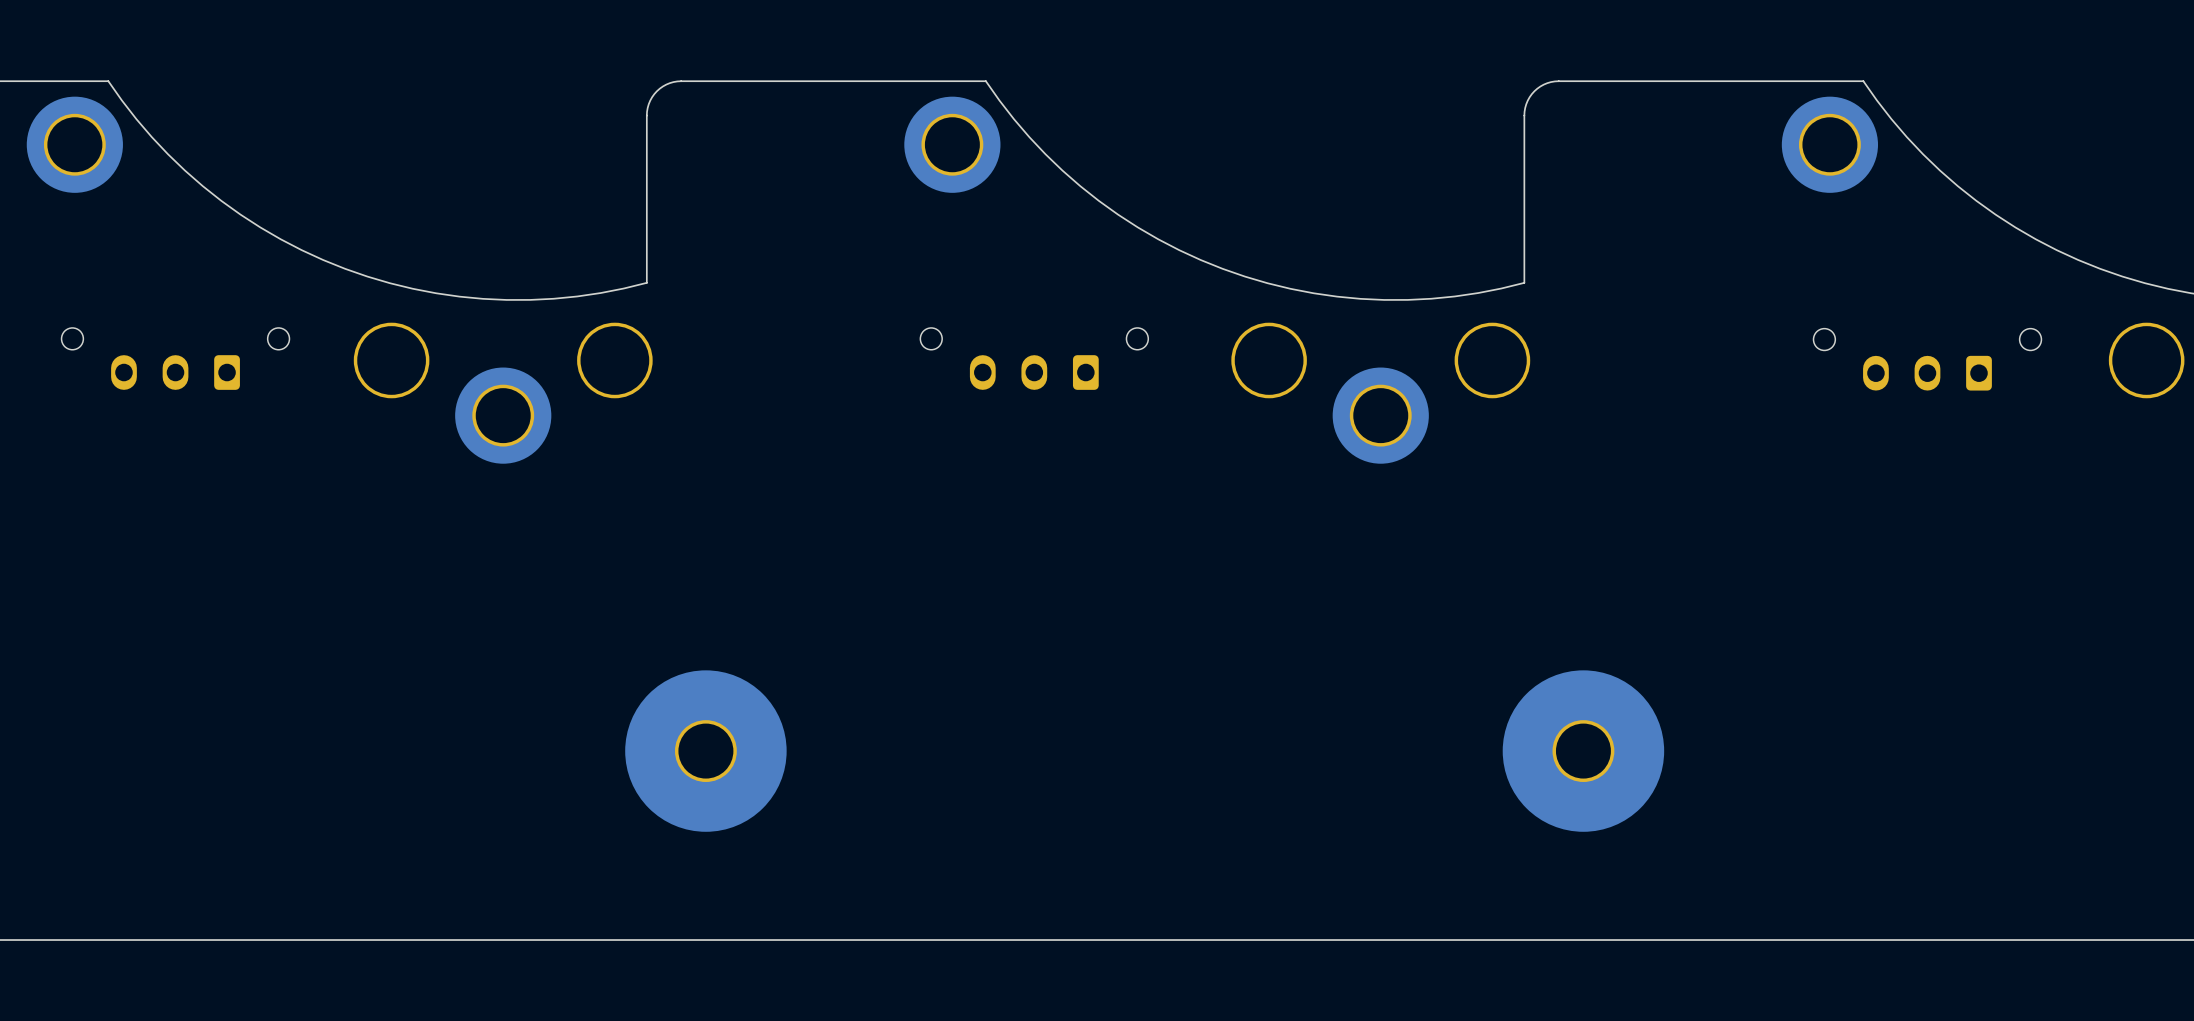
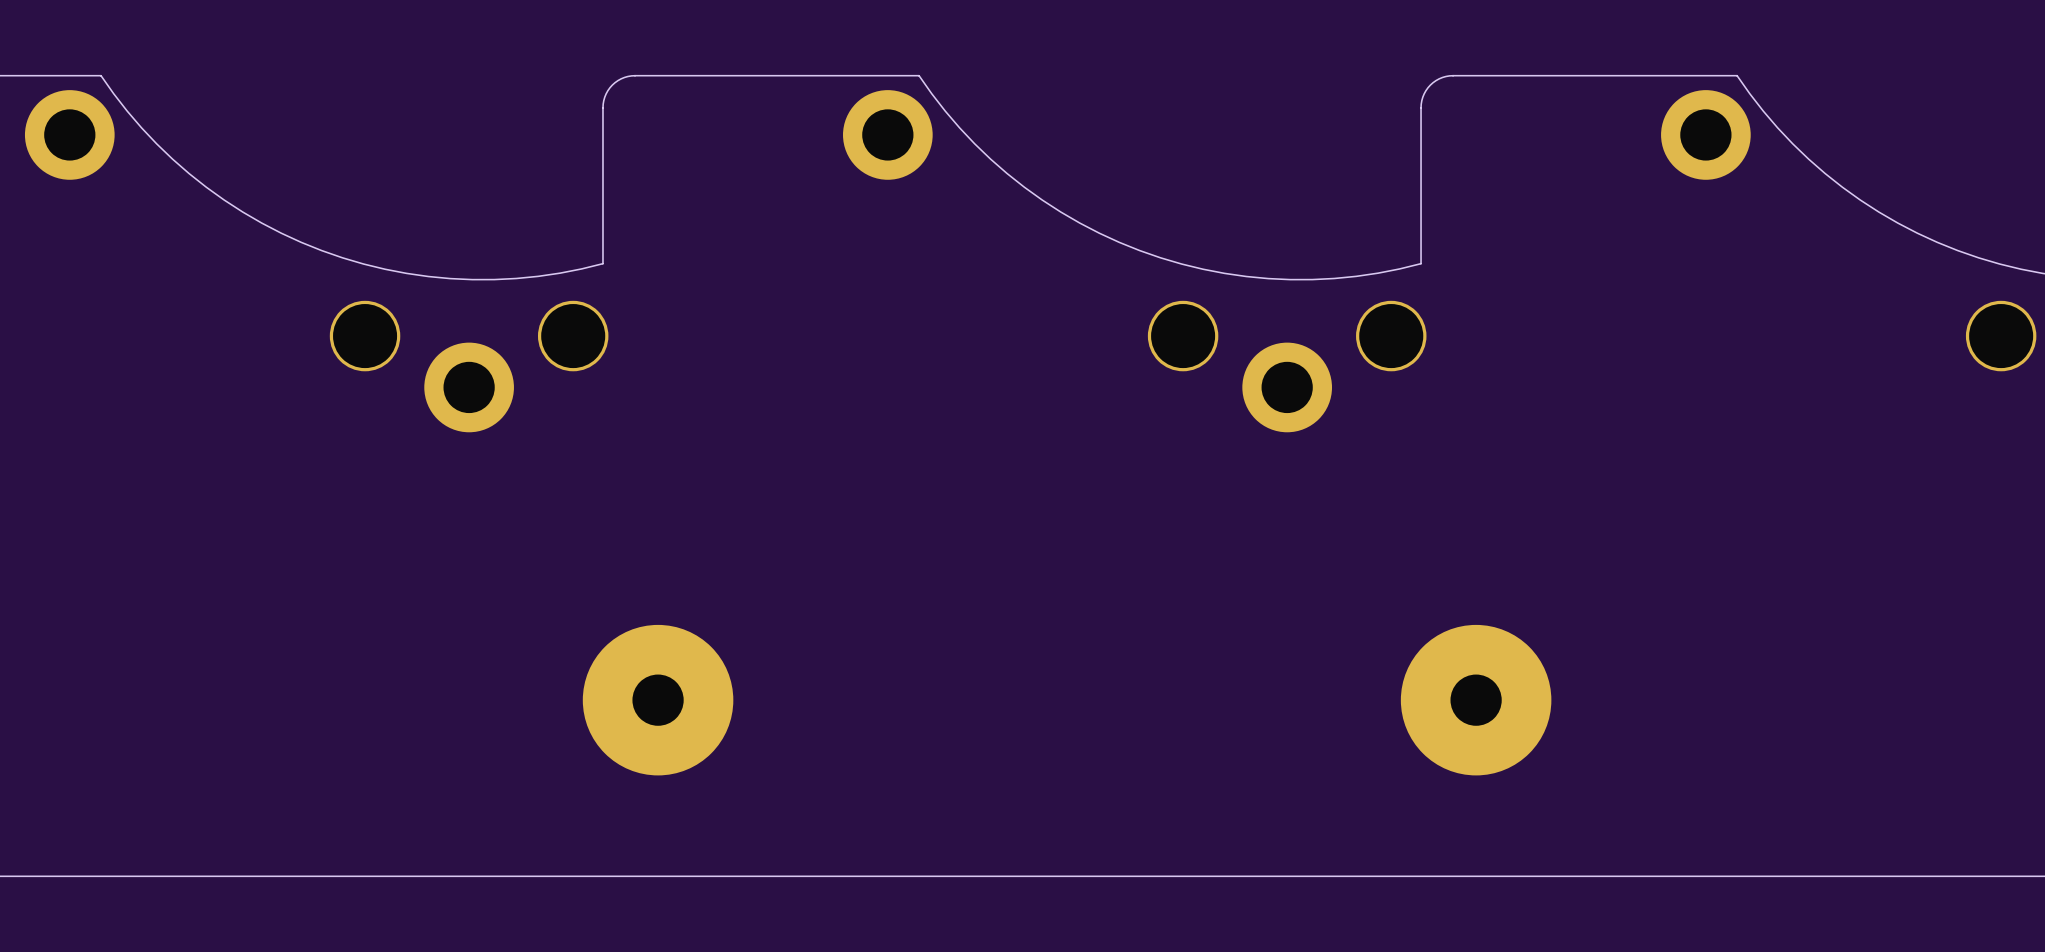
part: (175, 358) -> none
part: (1034, 358) -> none
part: (1927, 359) -> none

